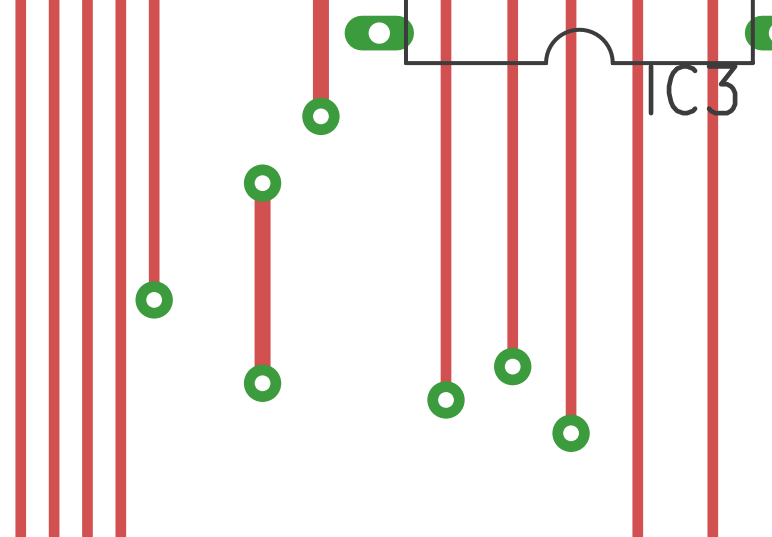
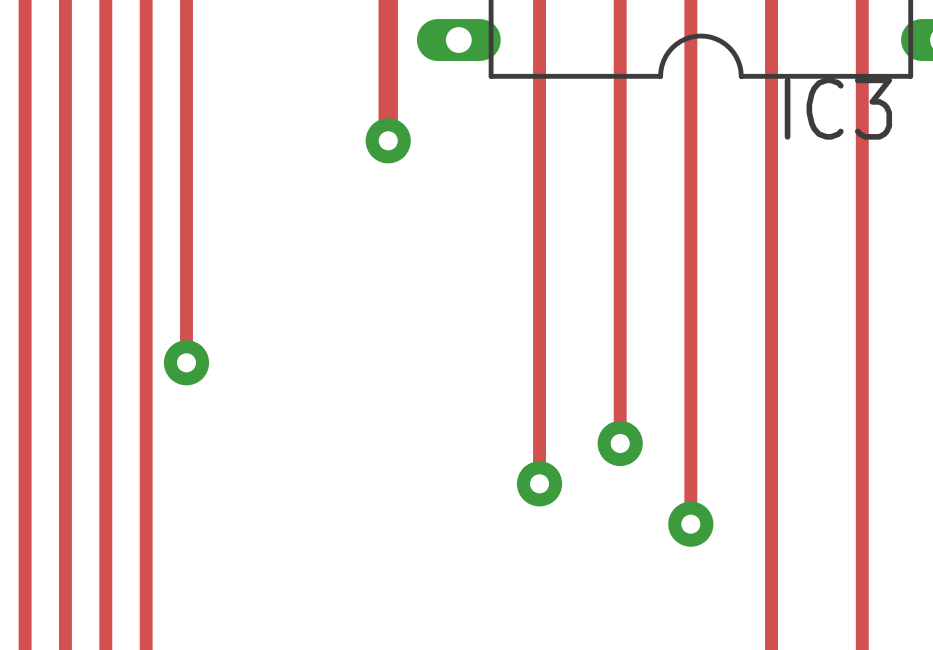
track: (262, 183) (262, 383) -> none
via: (262, 183) -> none
via: (262, 383) -> none

